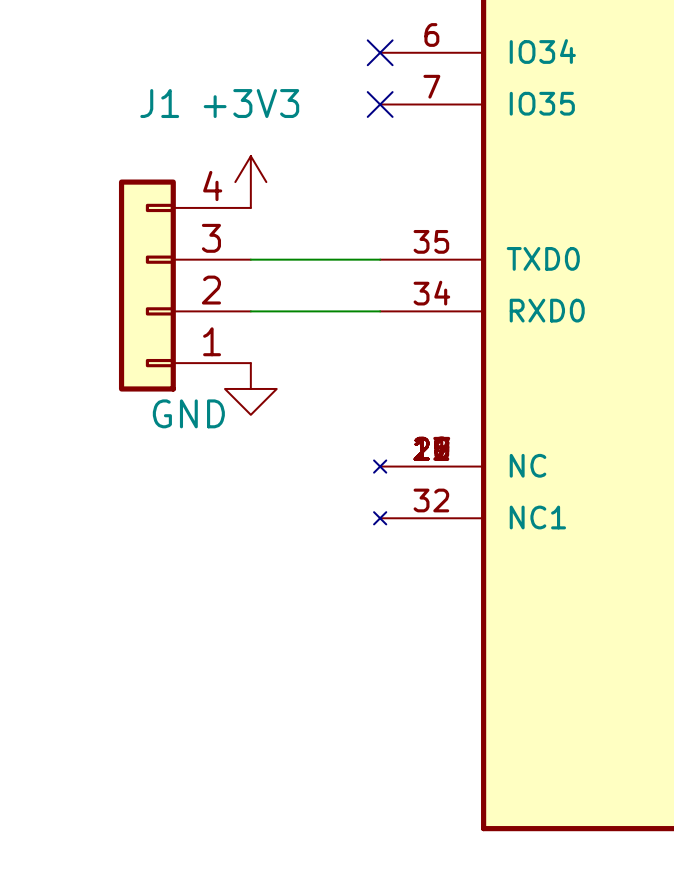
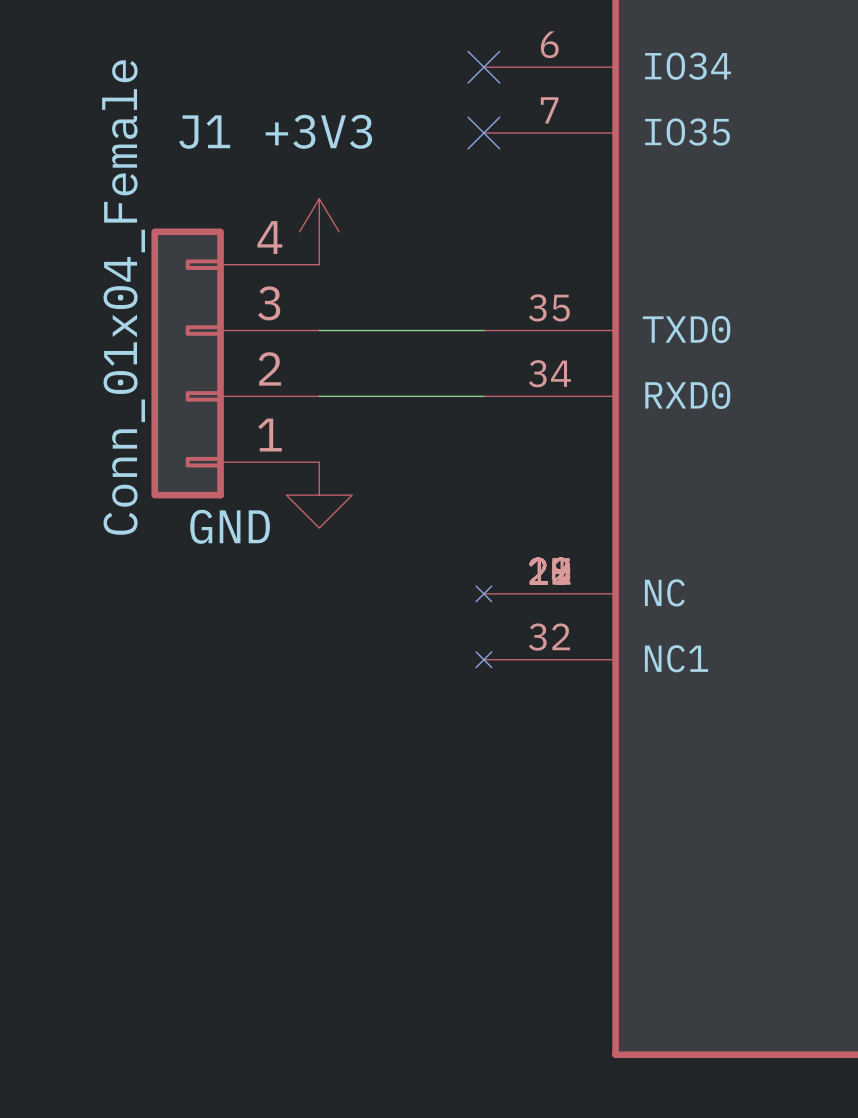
J1 value: none -> Conn_01x04_Female (123, 297)

